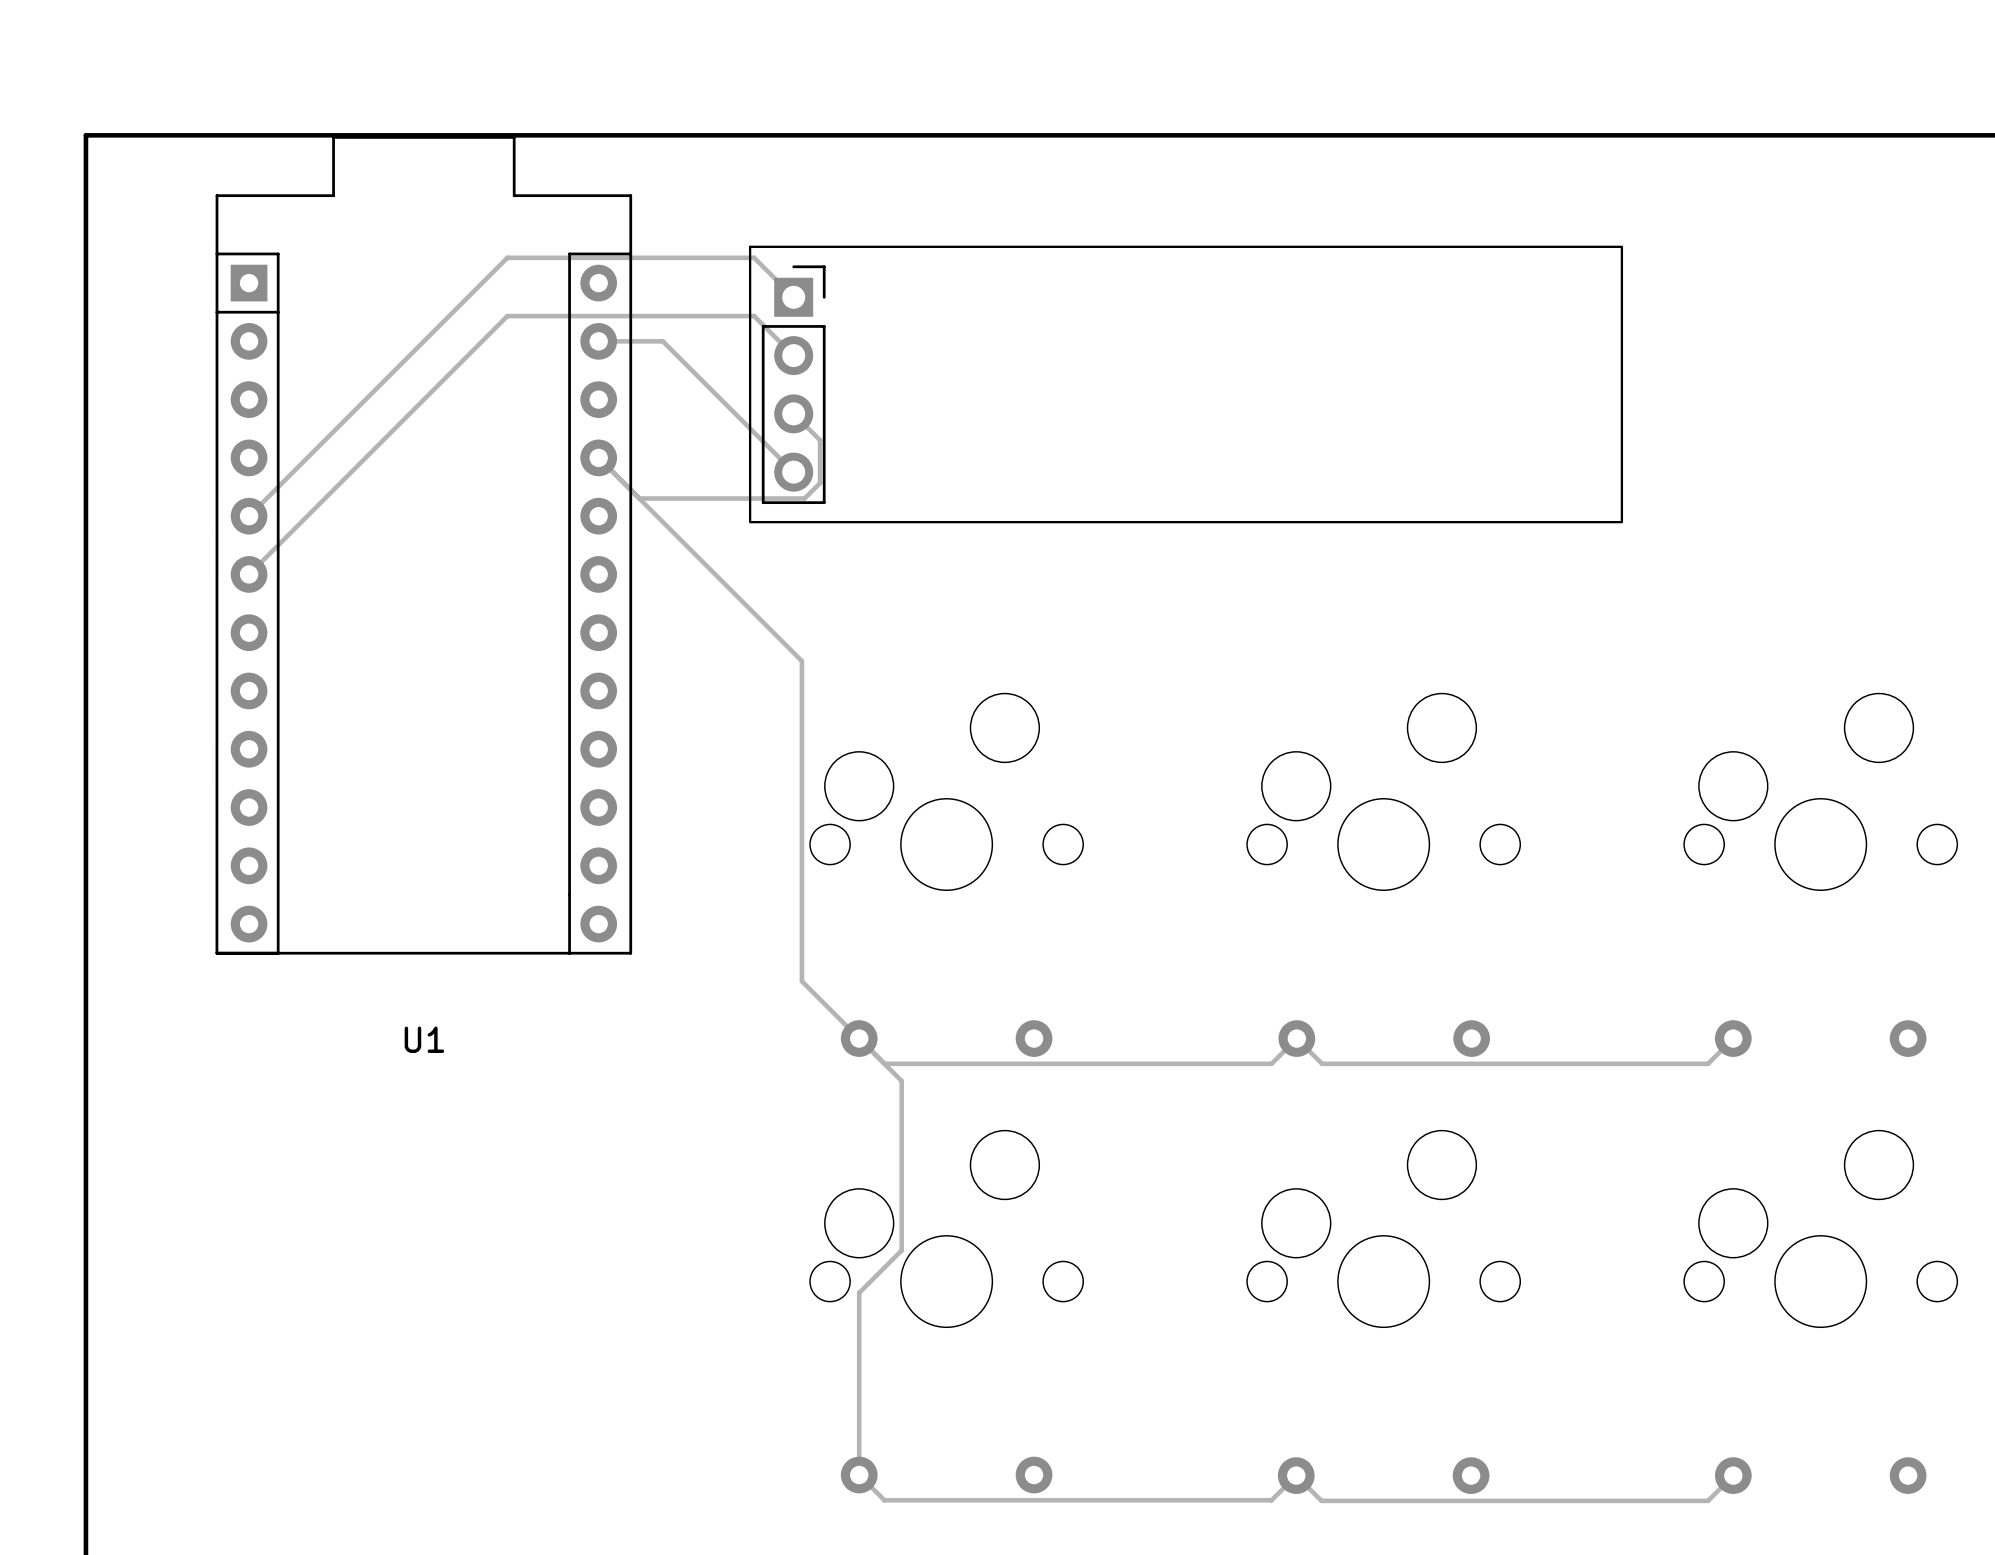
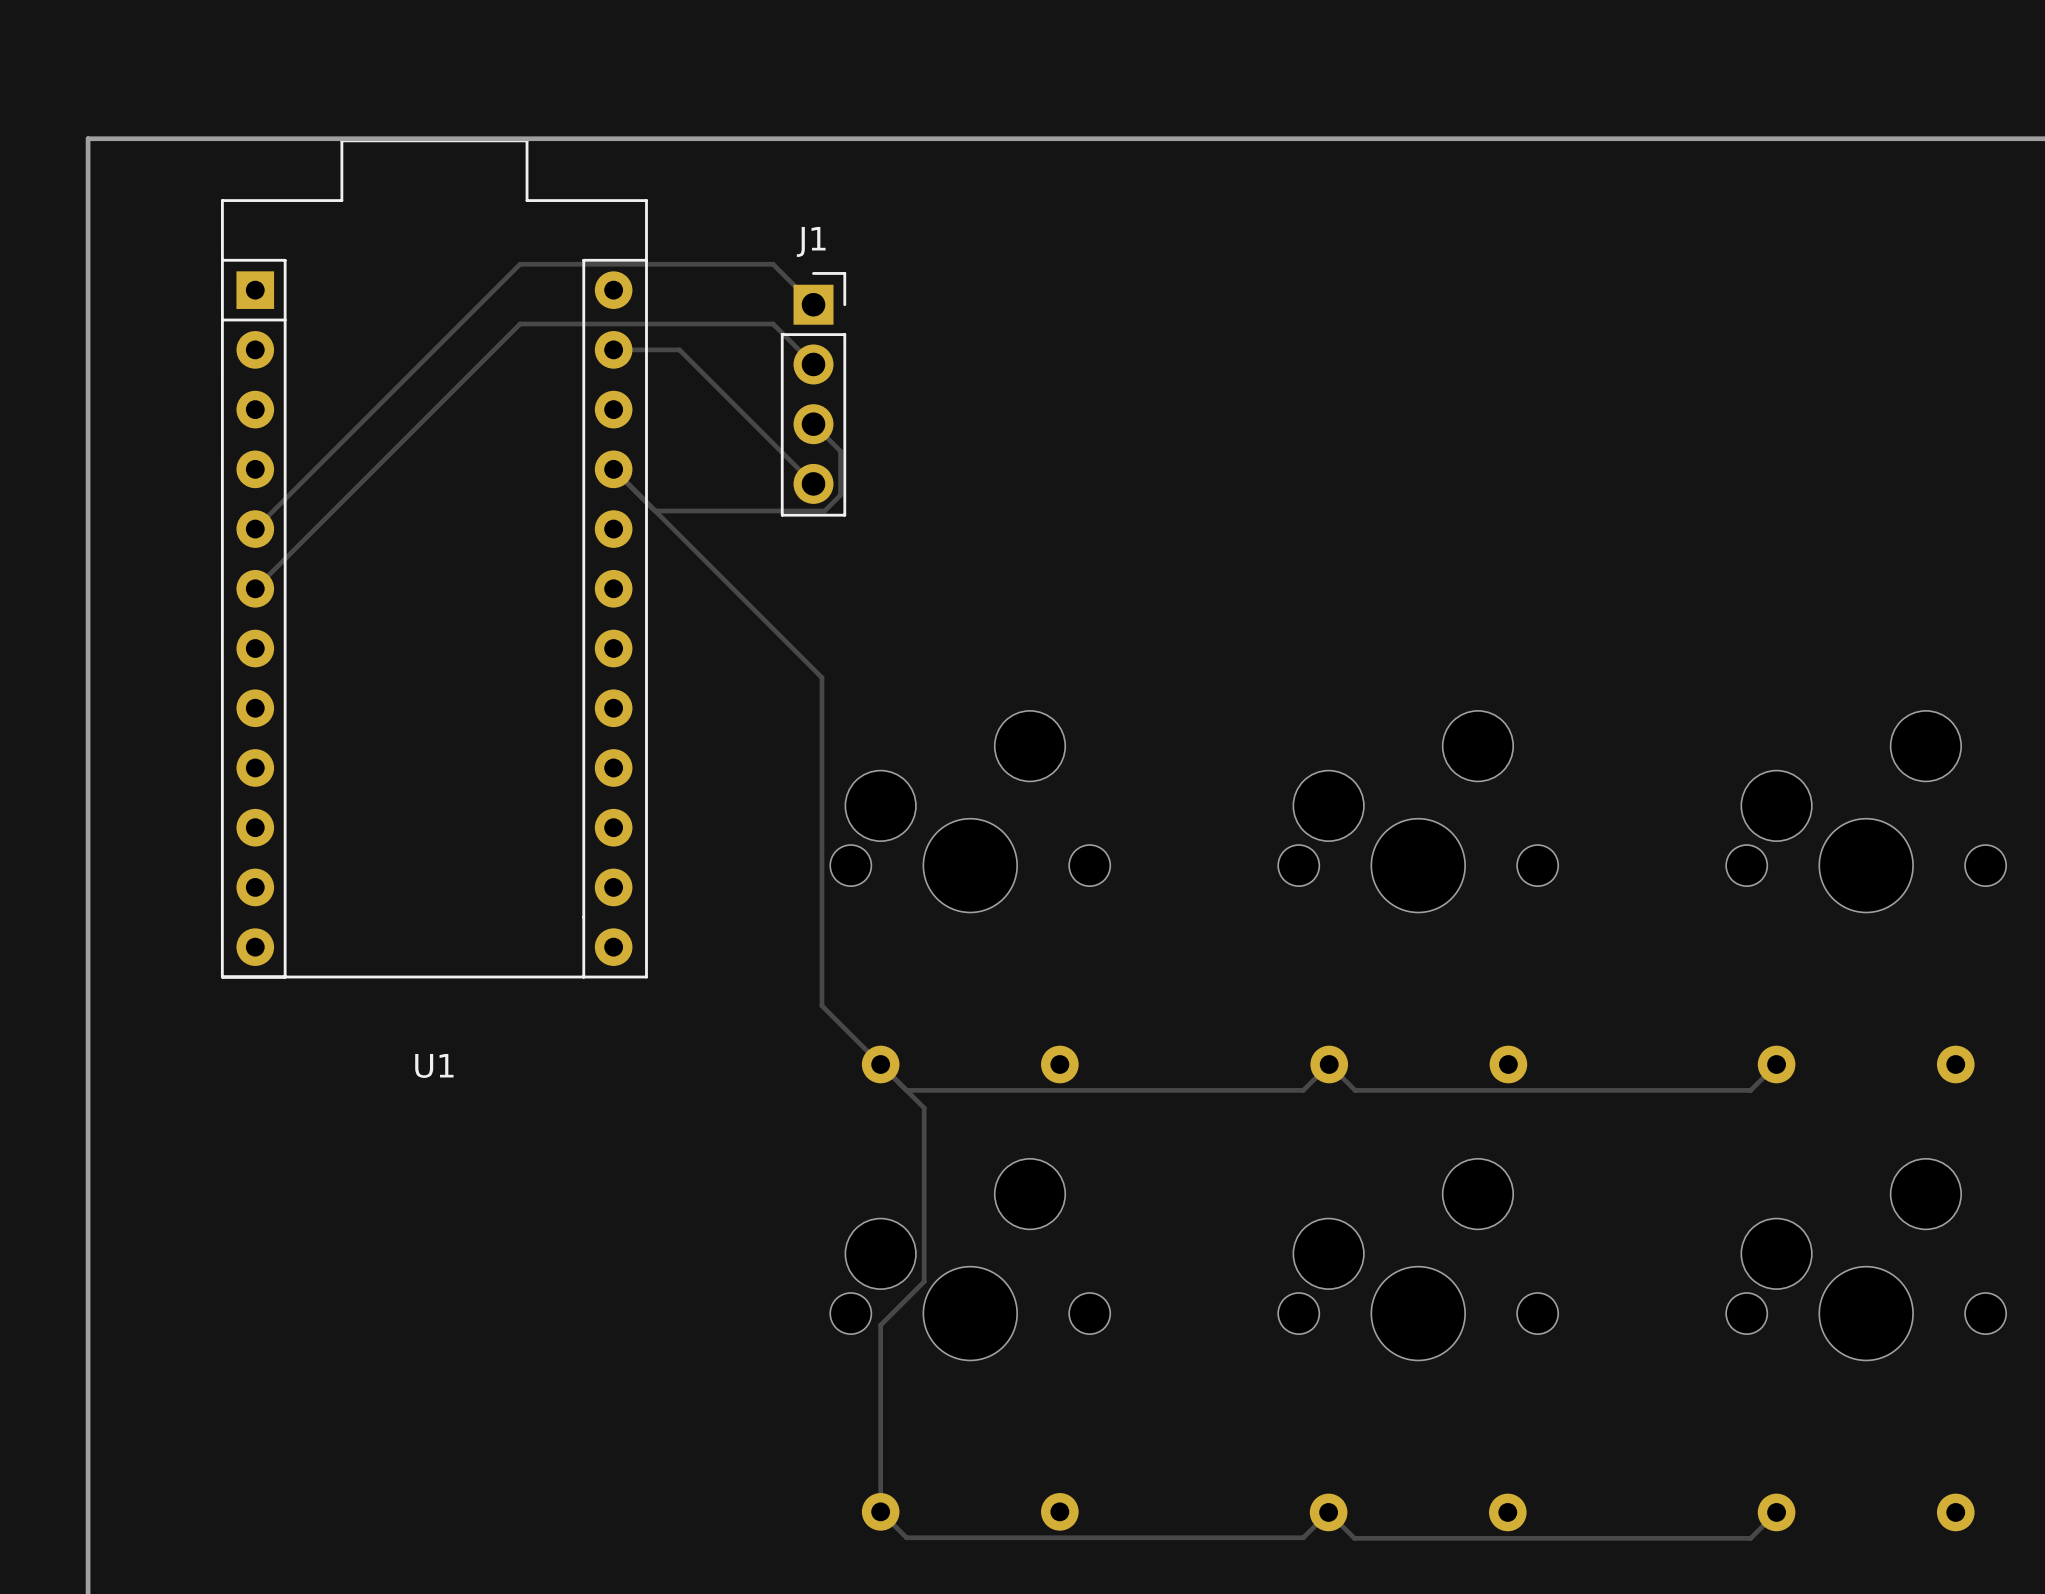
J1: none -> (813, 394)
part: (1186, 384) -> none

